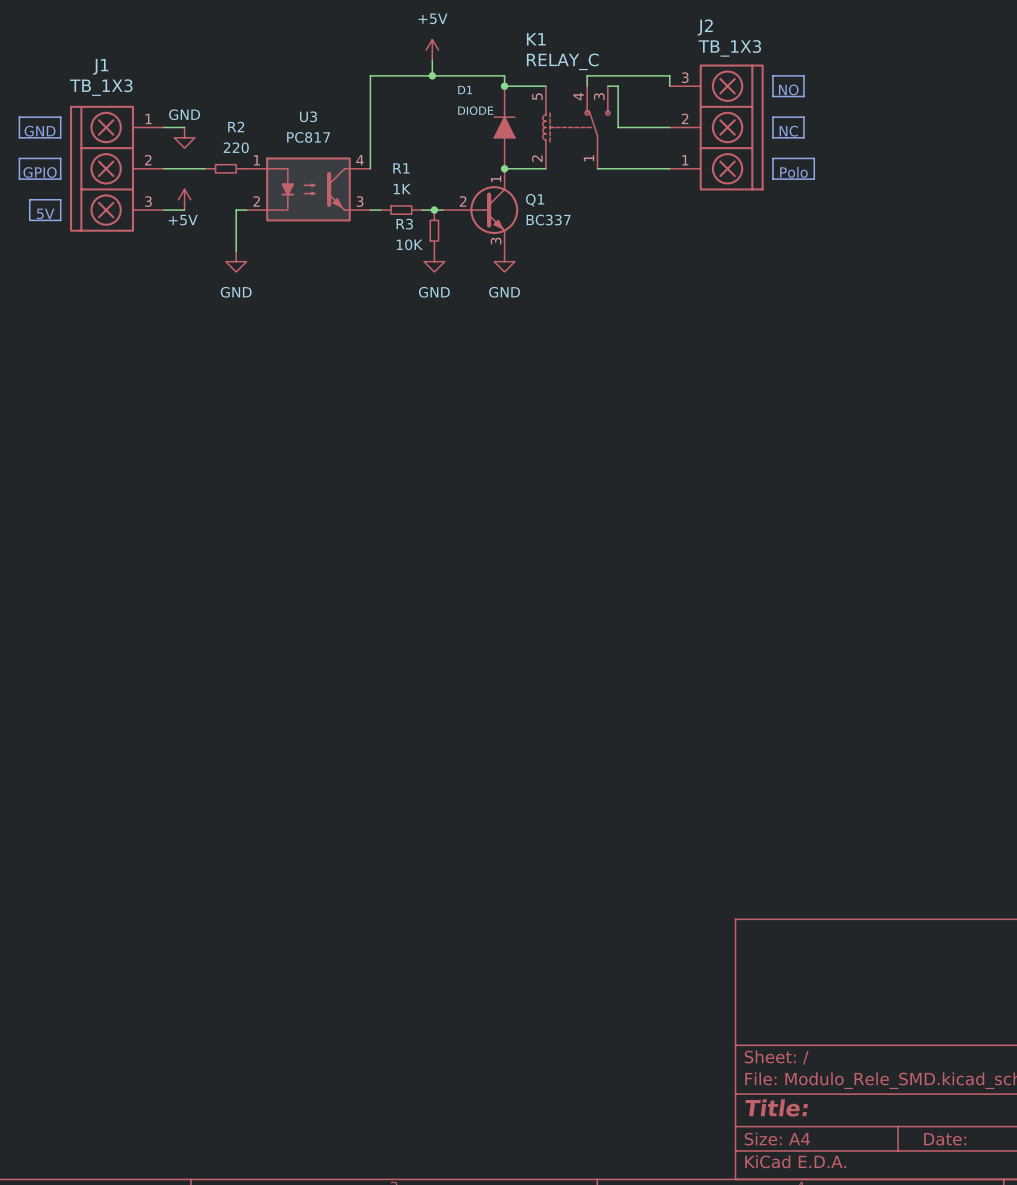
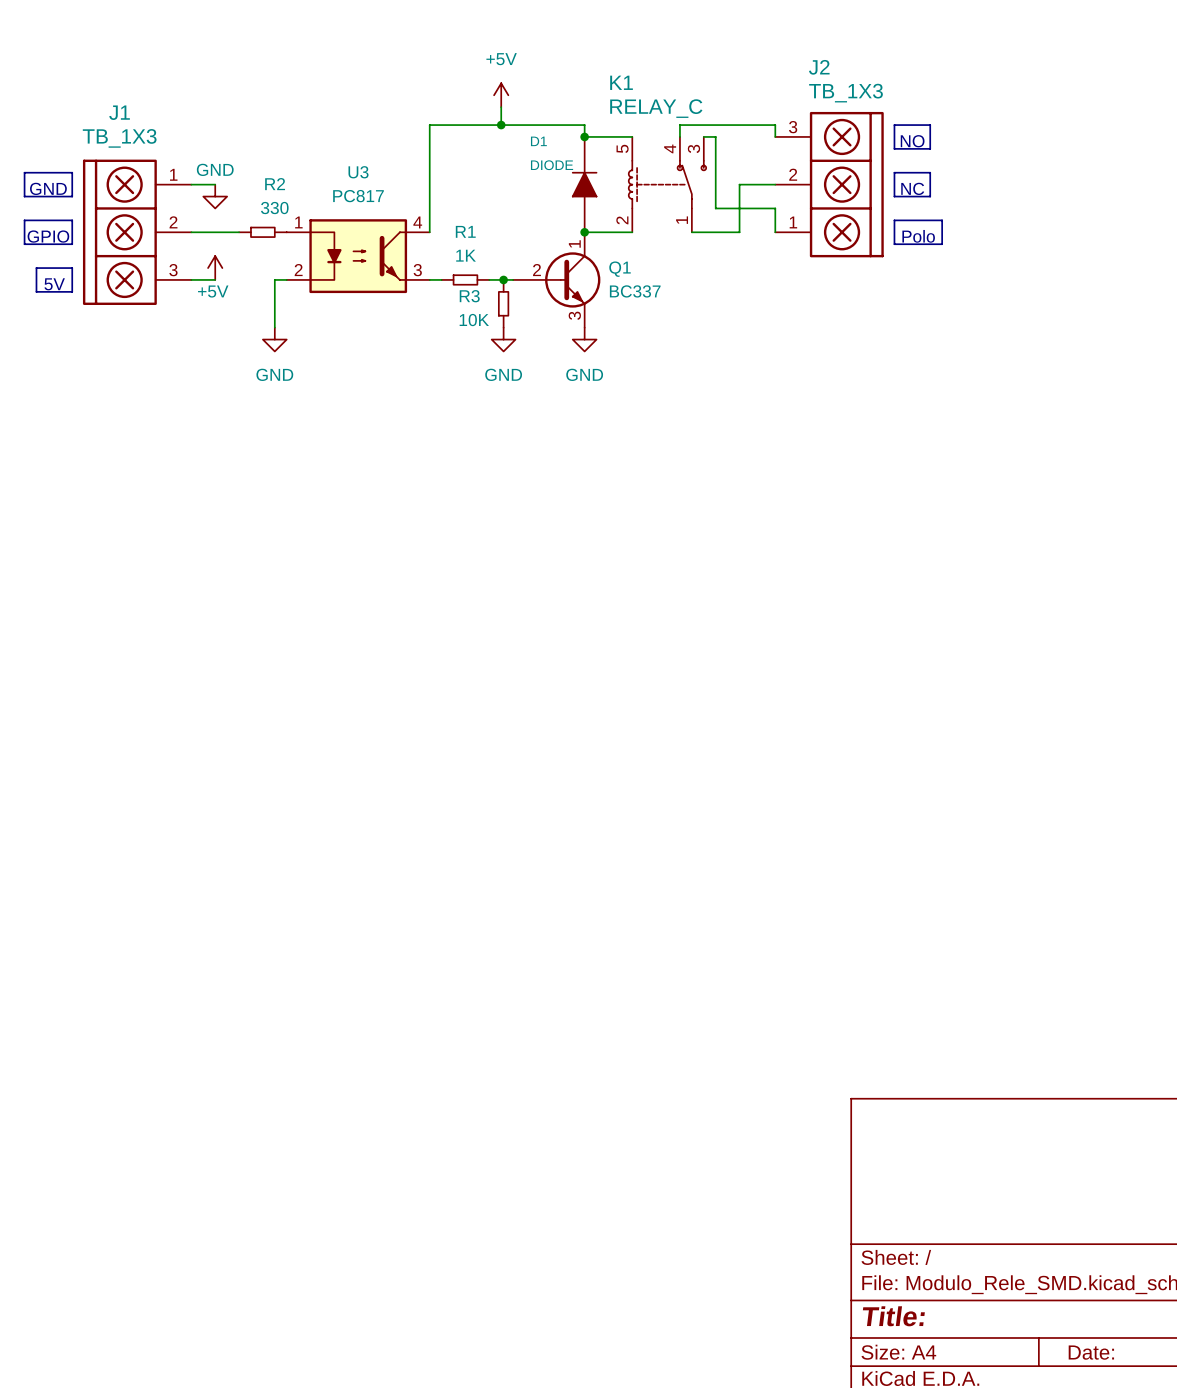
wire: (618, 127) (638, 127) -> (739, 232) (739, 184)
R2 value: 220 (236, 147) -> 330 (274, 208)
wire: (638, 168) (669, 168) -> (715, 184) (715, 208) (775, 208) (775, 232)

